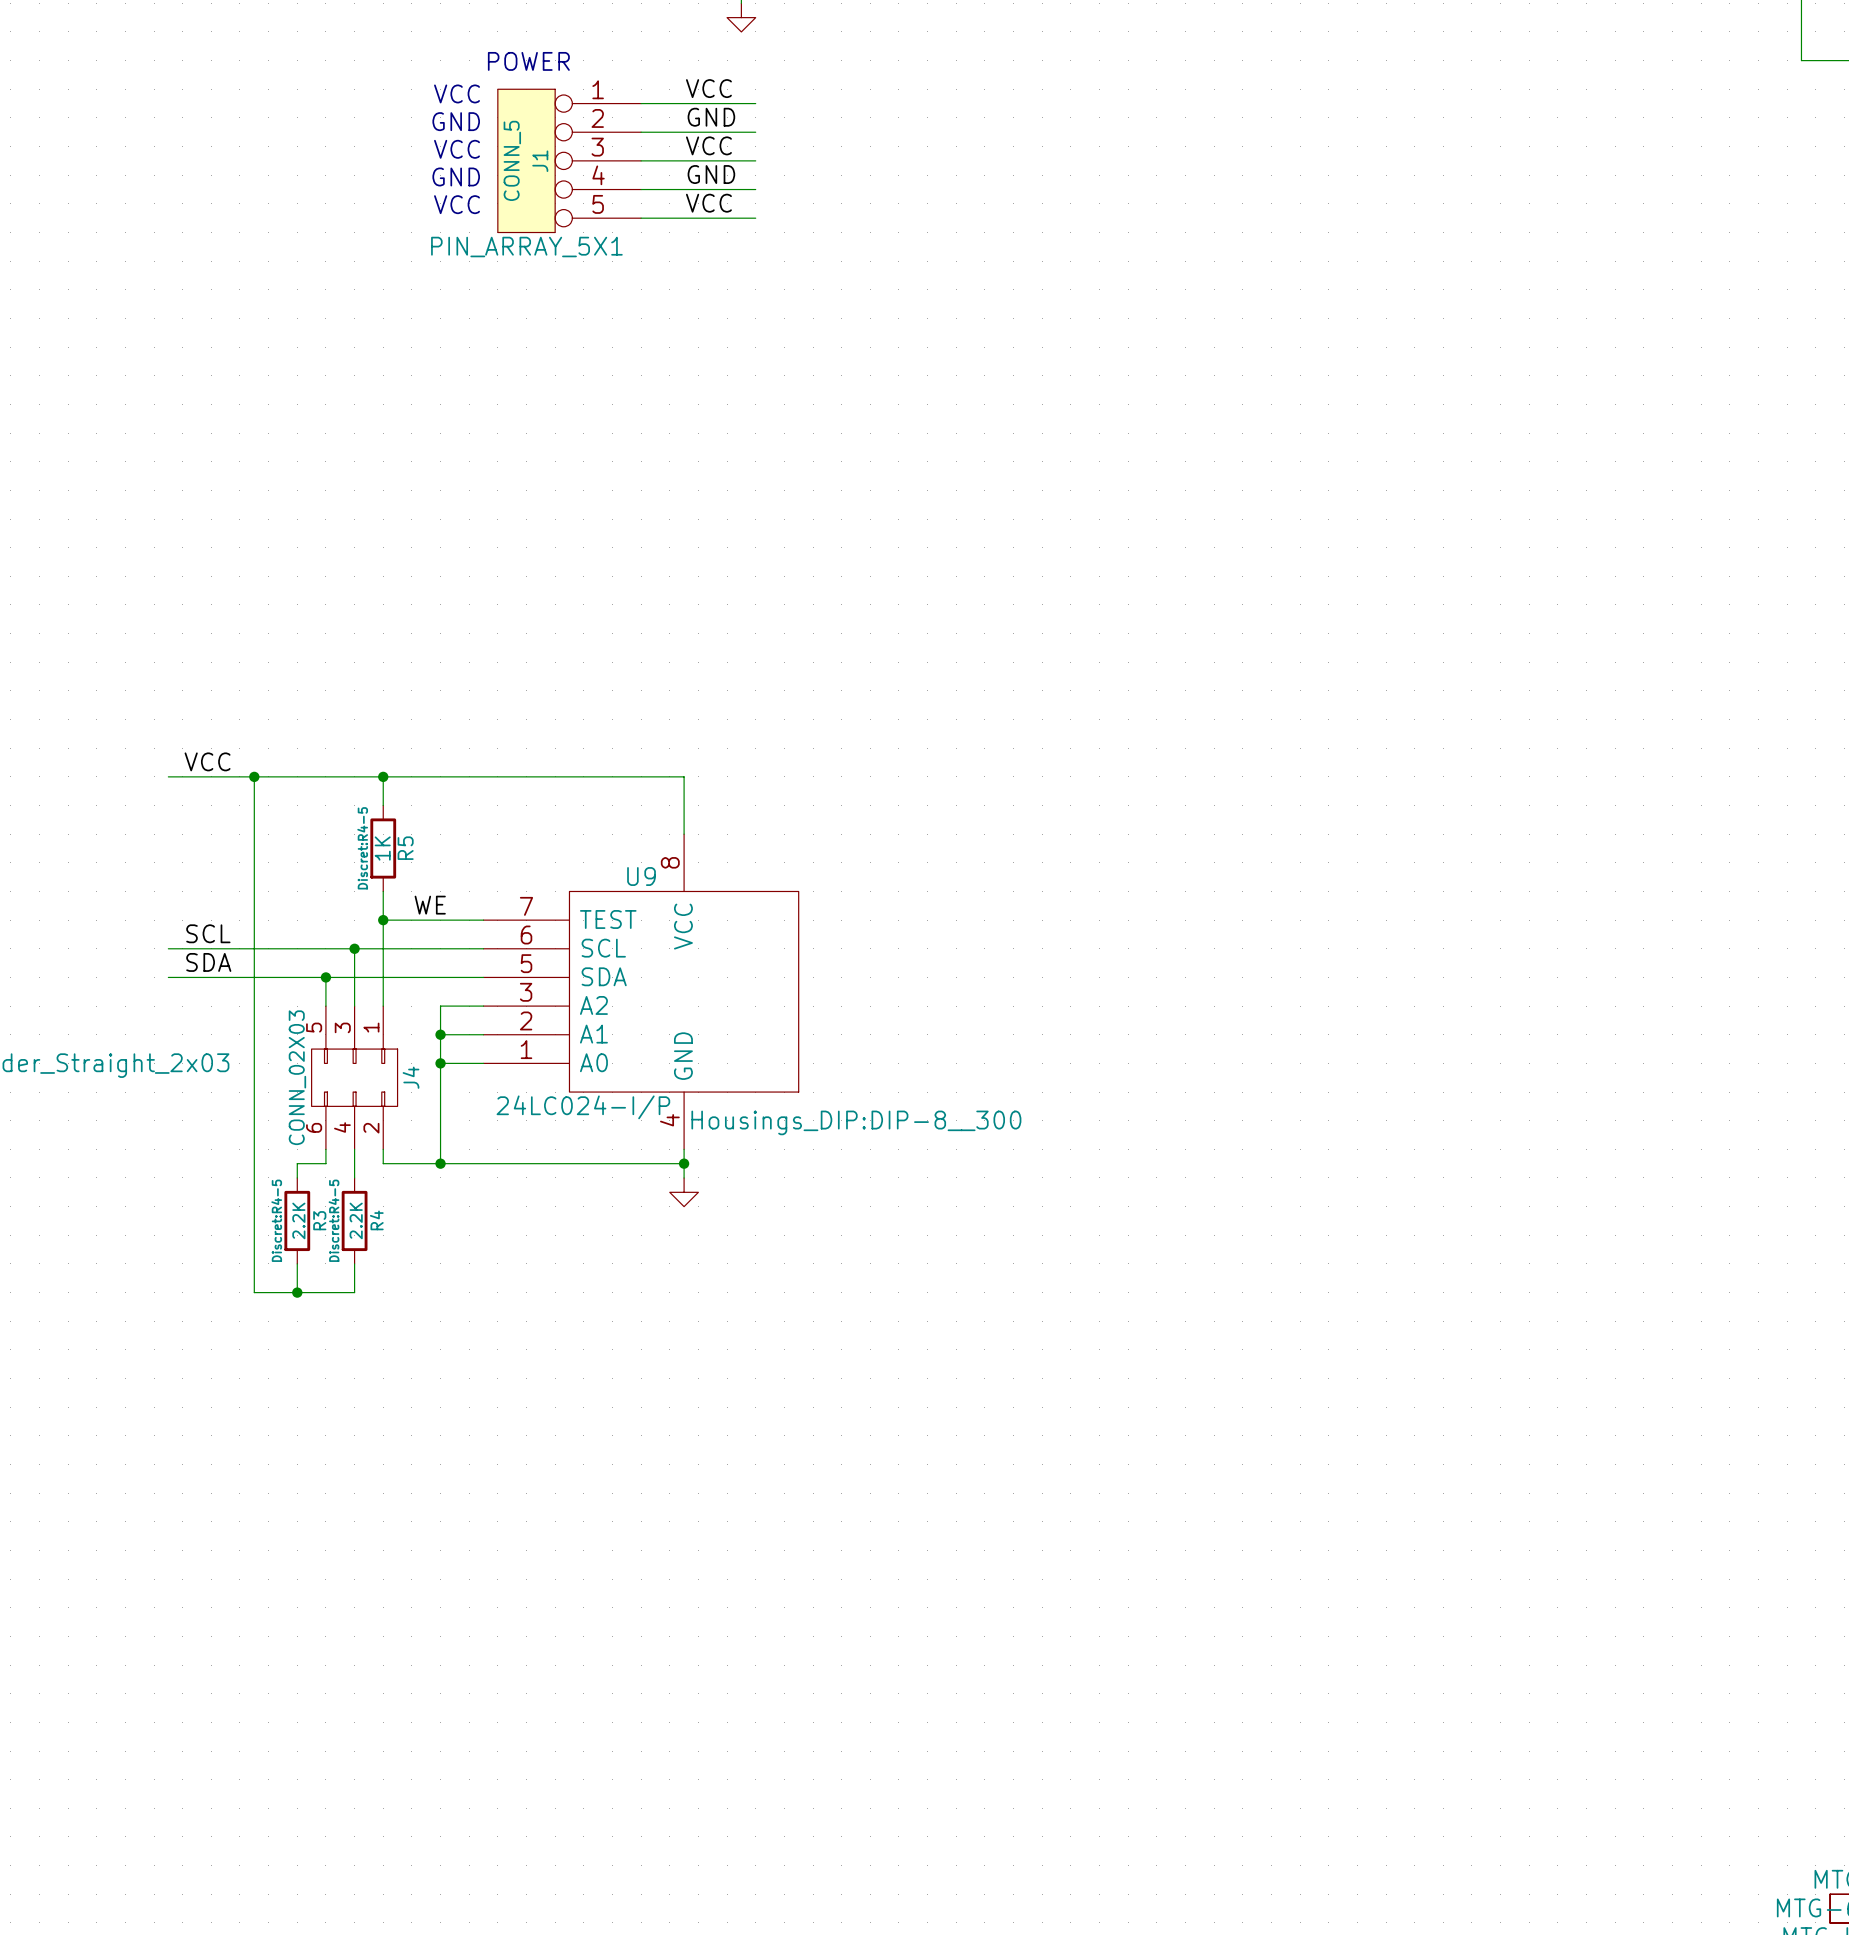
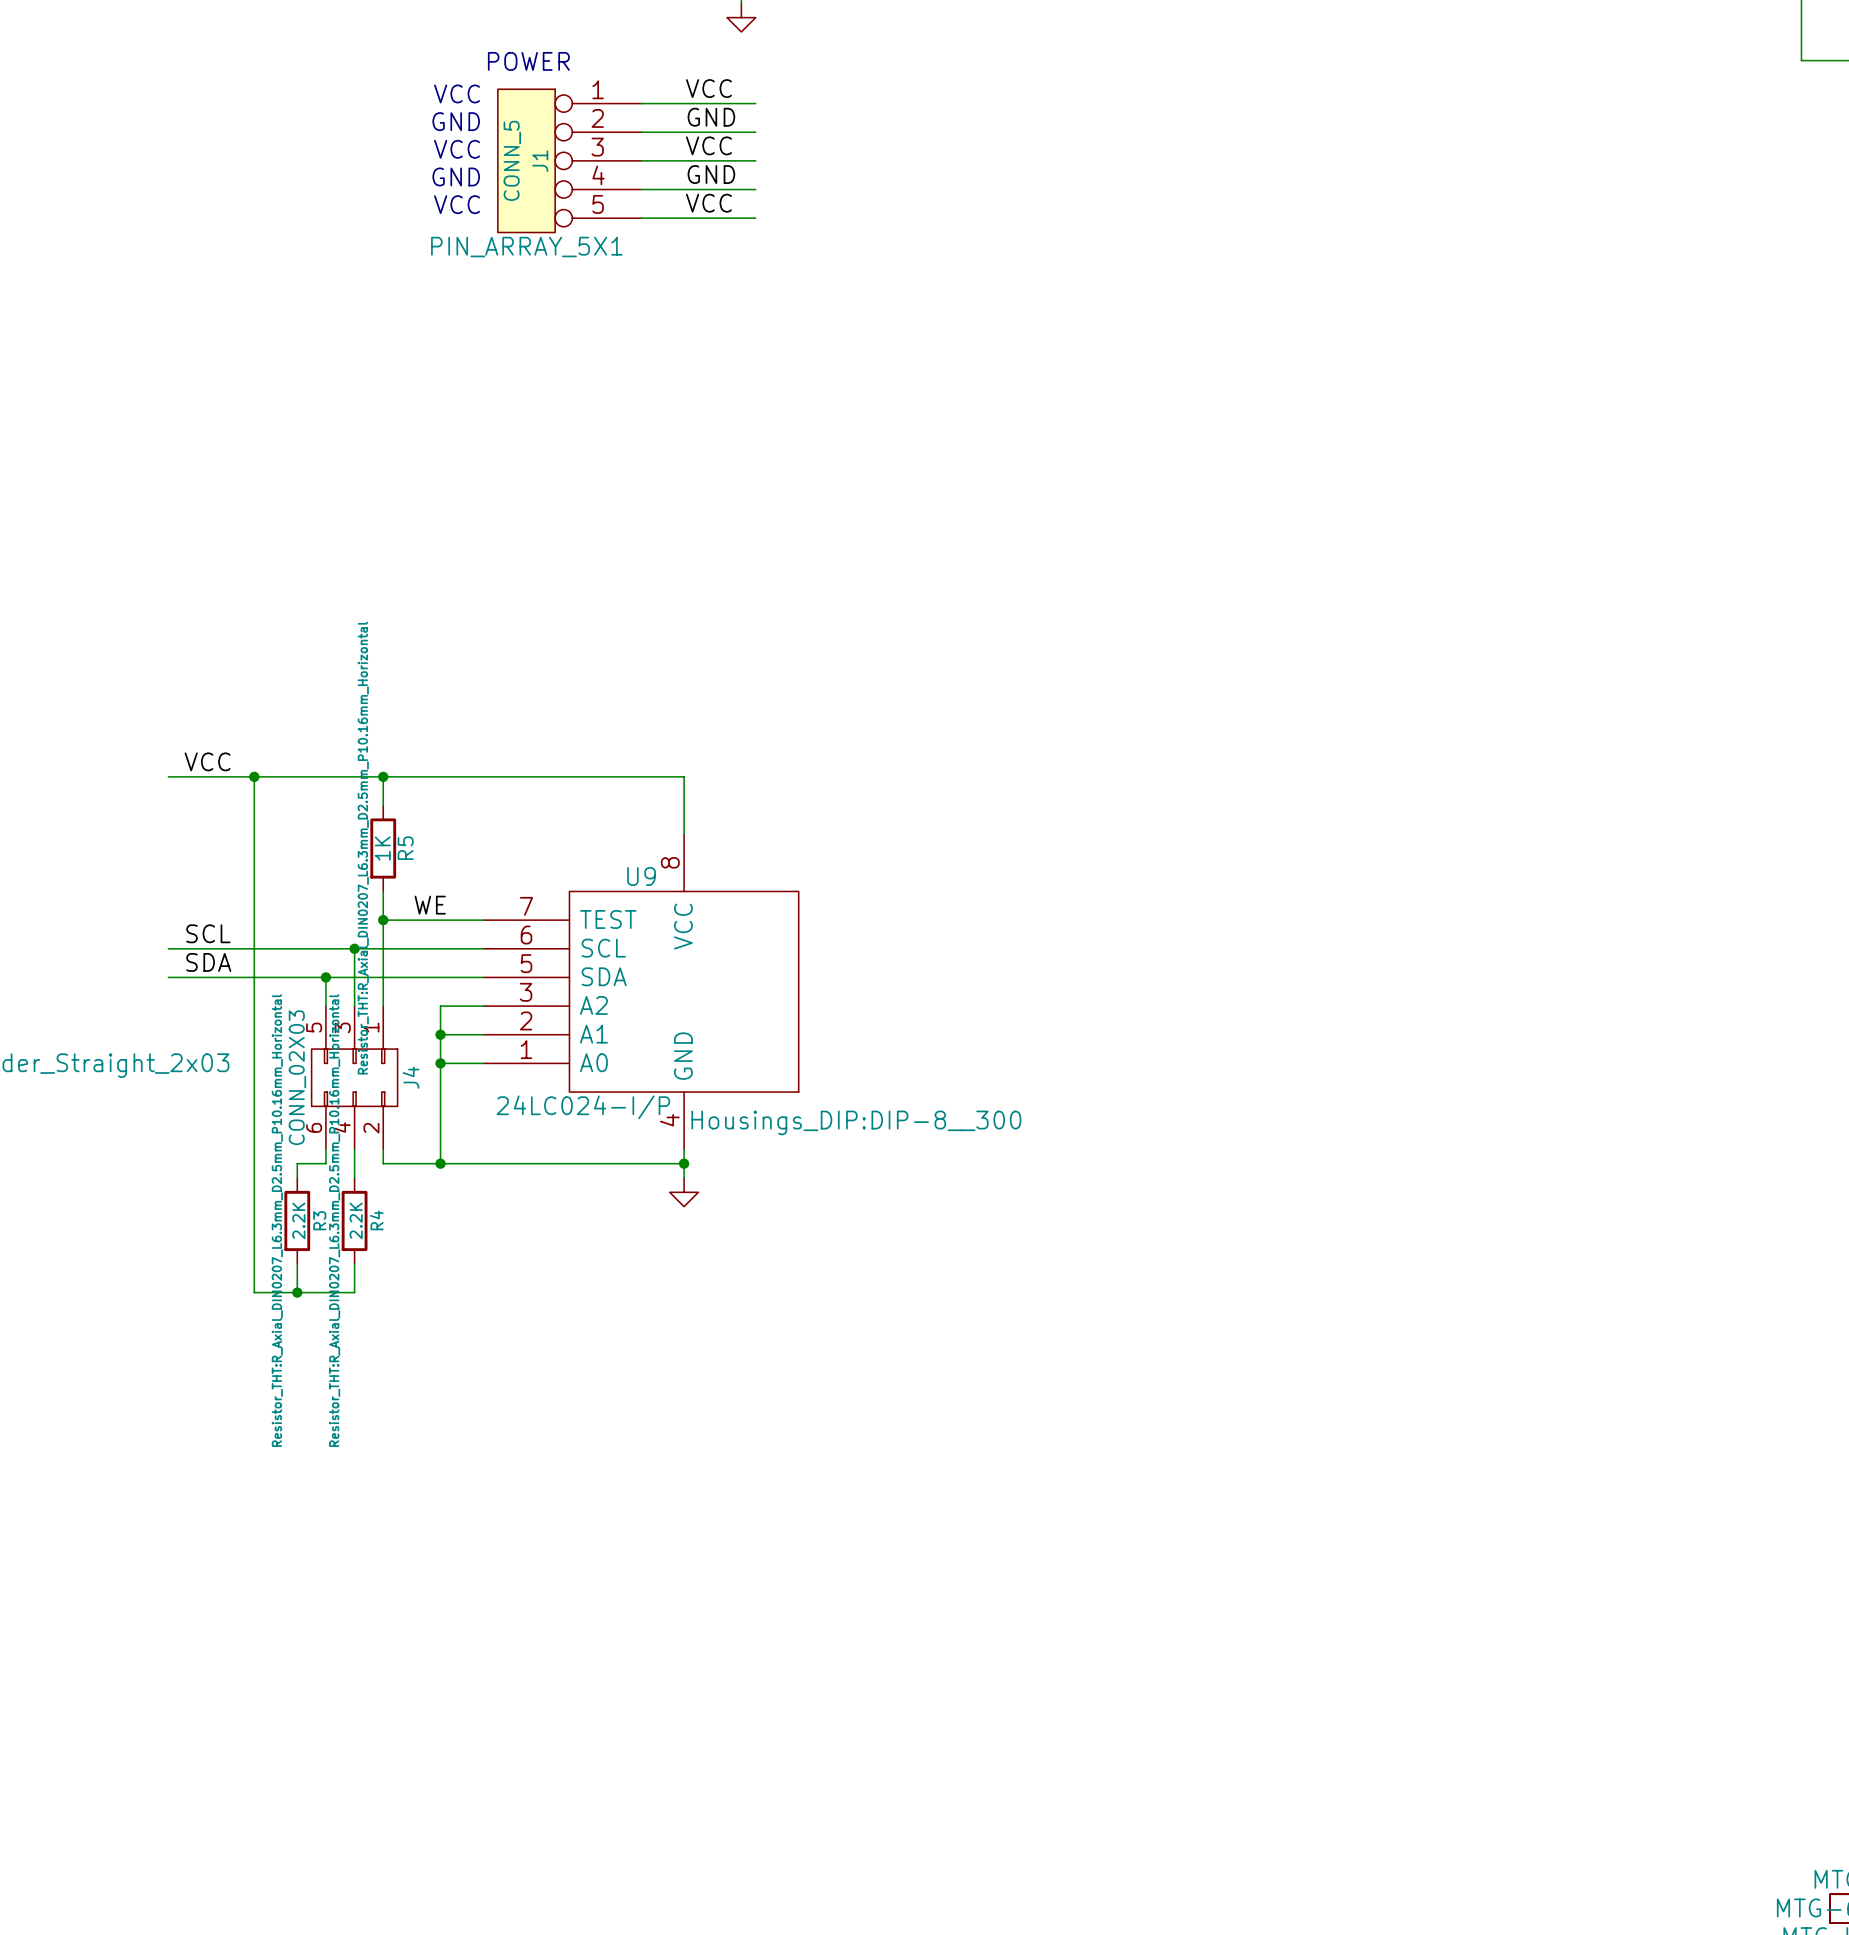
R5 text: Discret:R4-5 (362, 848) -> Resistor_THT:R_Axial_DIN0207_L6.3mm_D2.5mm_P10.16mm_Horizontal (363, 848)
R3 text: Discret:R4-5 (276, 1220) -> Resistor_THT:R_Axial_DIN0207_L6.3mm_D2.5mm_P10.16mm_Horizontal (277, 1220)
R4 text: Discret:R4-5 (334, 1220) -> Resistor_THT:R_Axial_DIN0207_L6.3mm_D2.5mm_P10.16mm_Horizontal (334, 1220)

